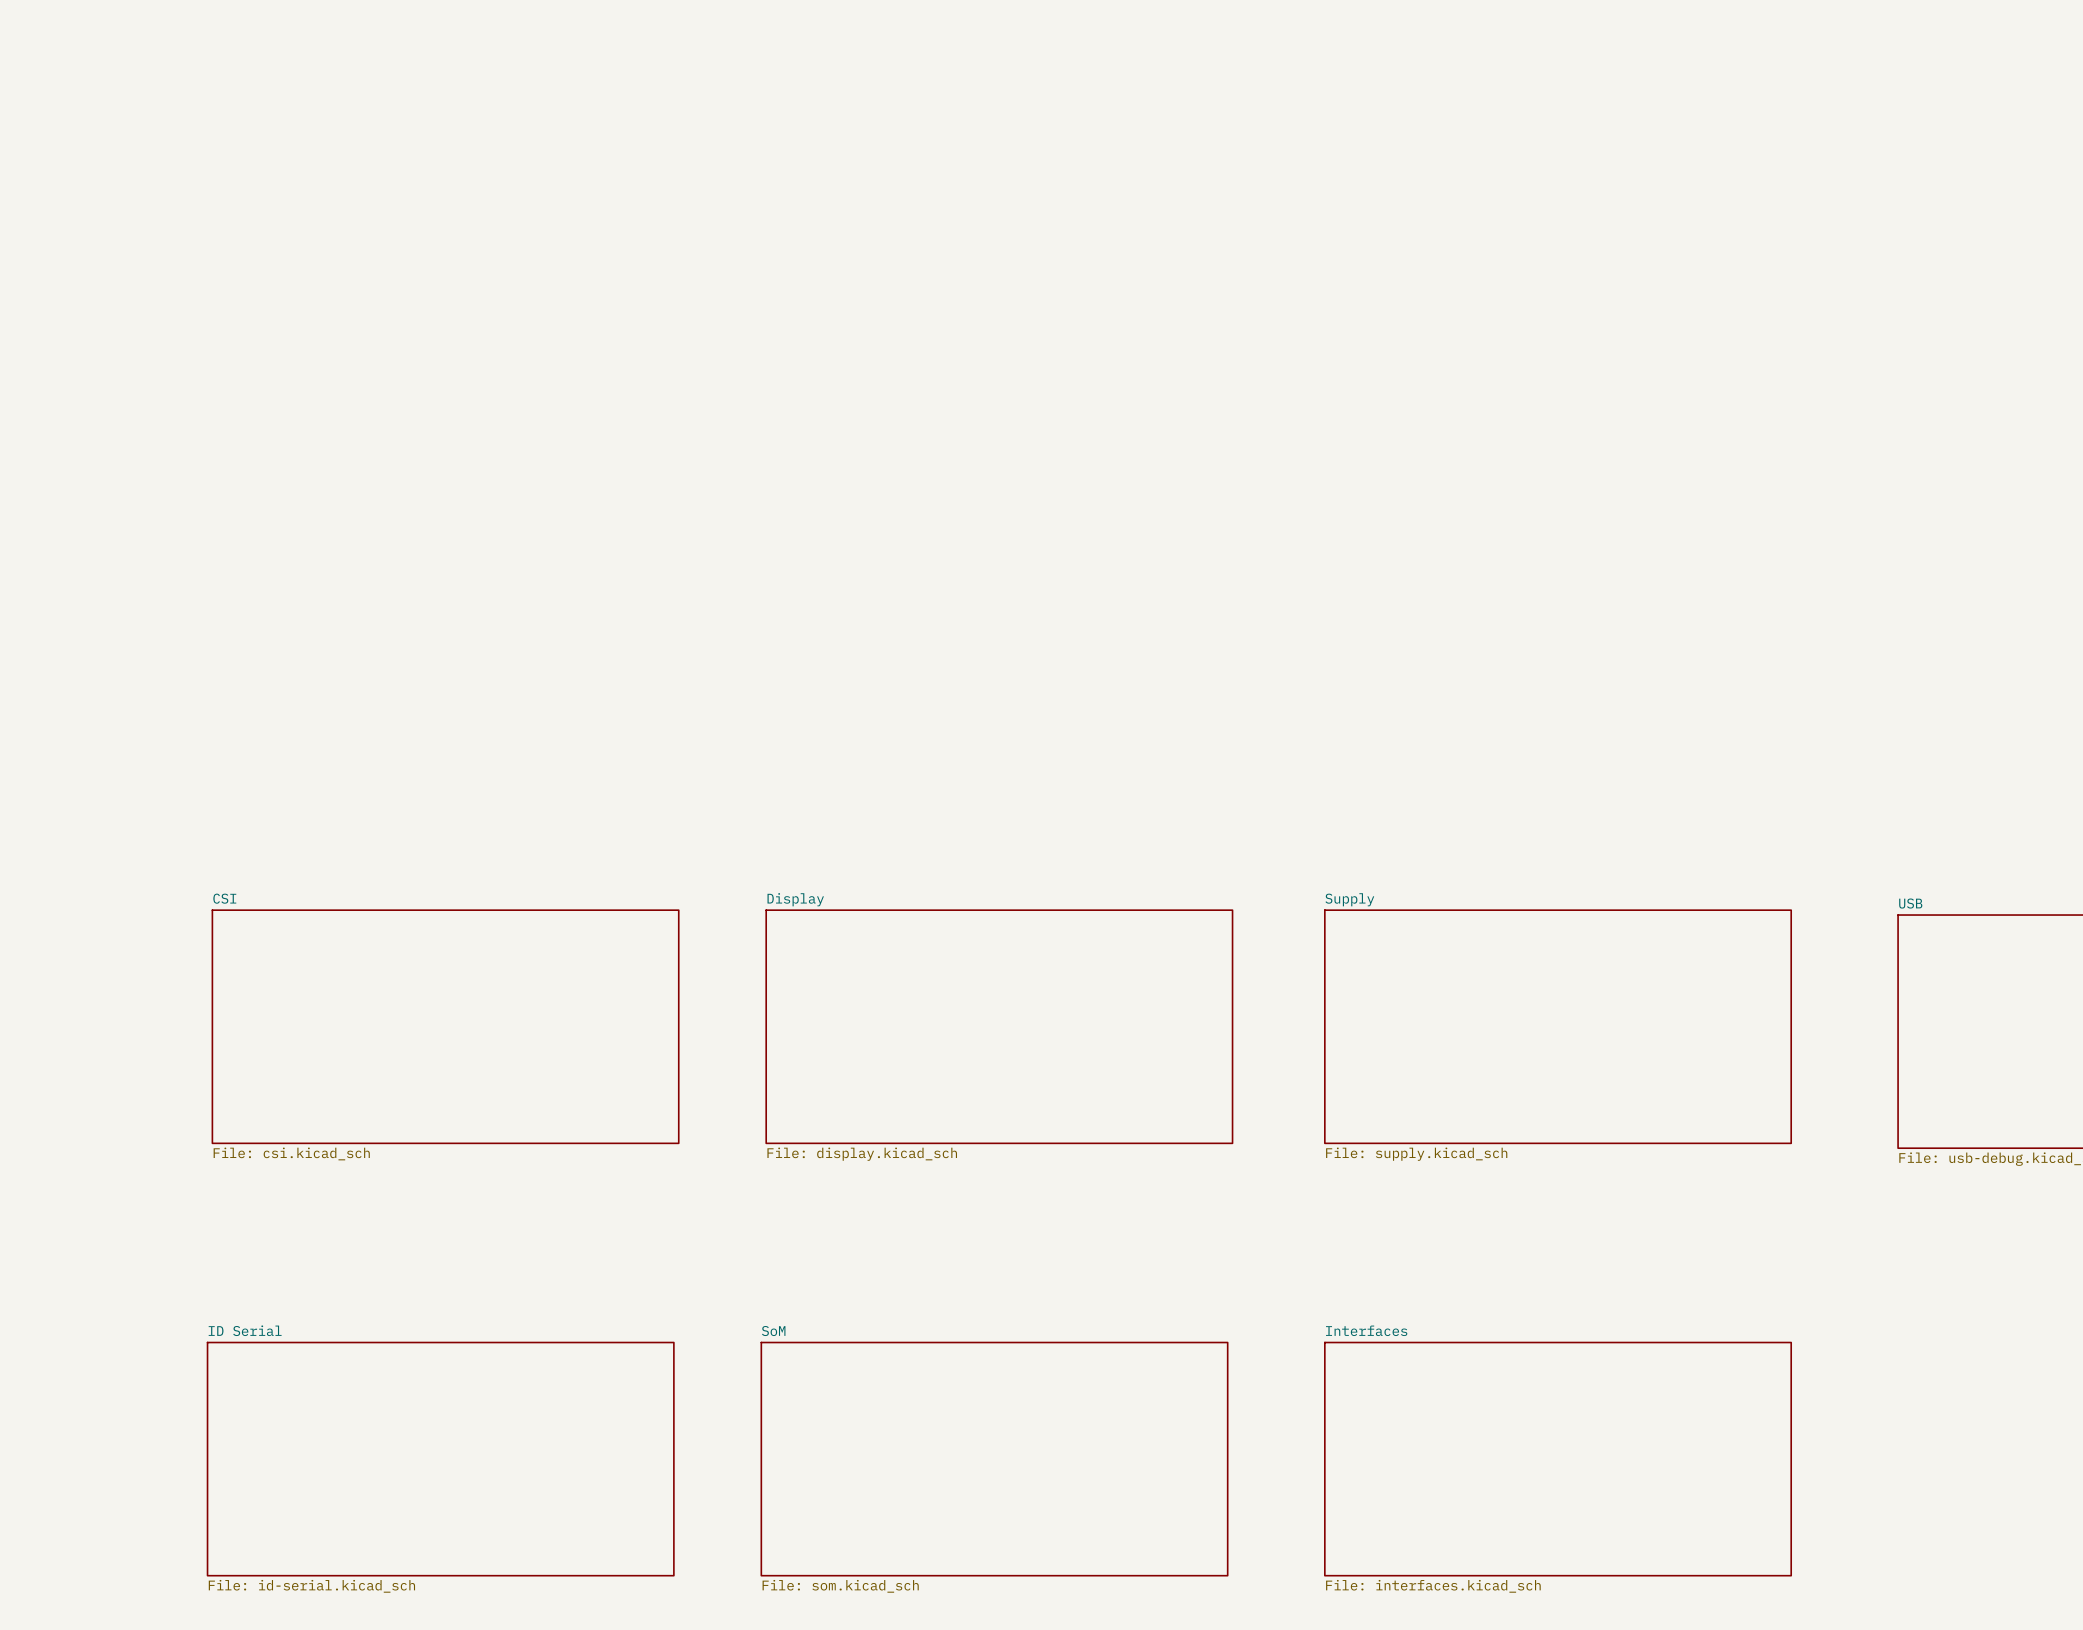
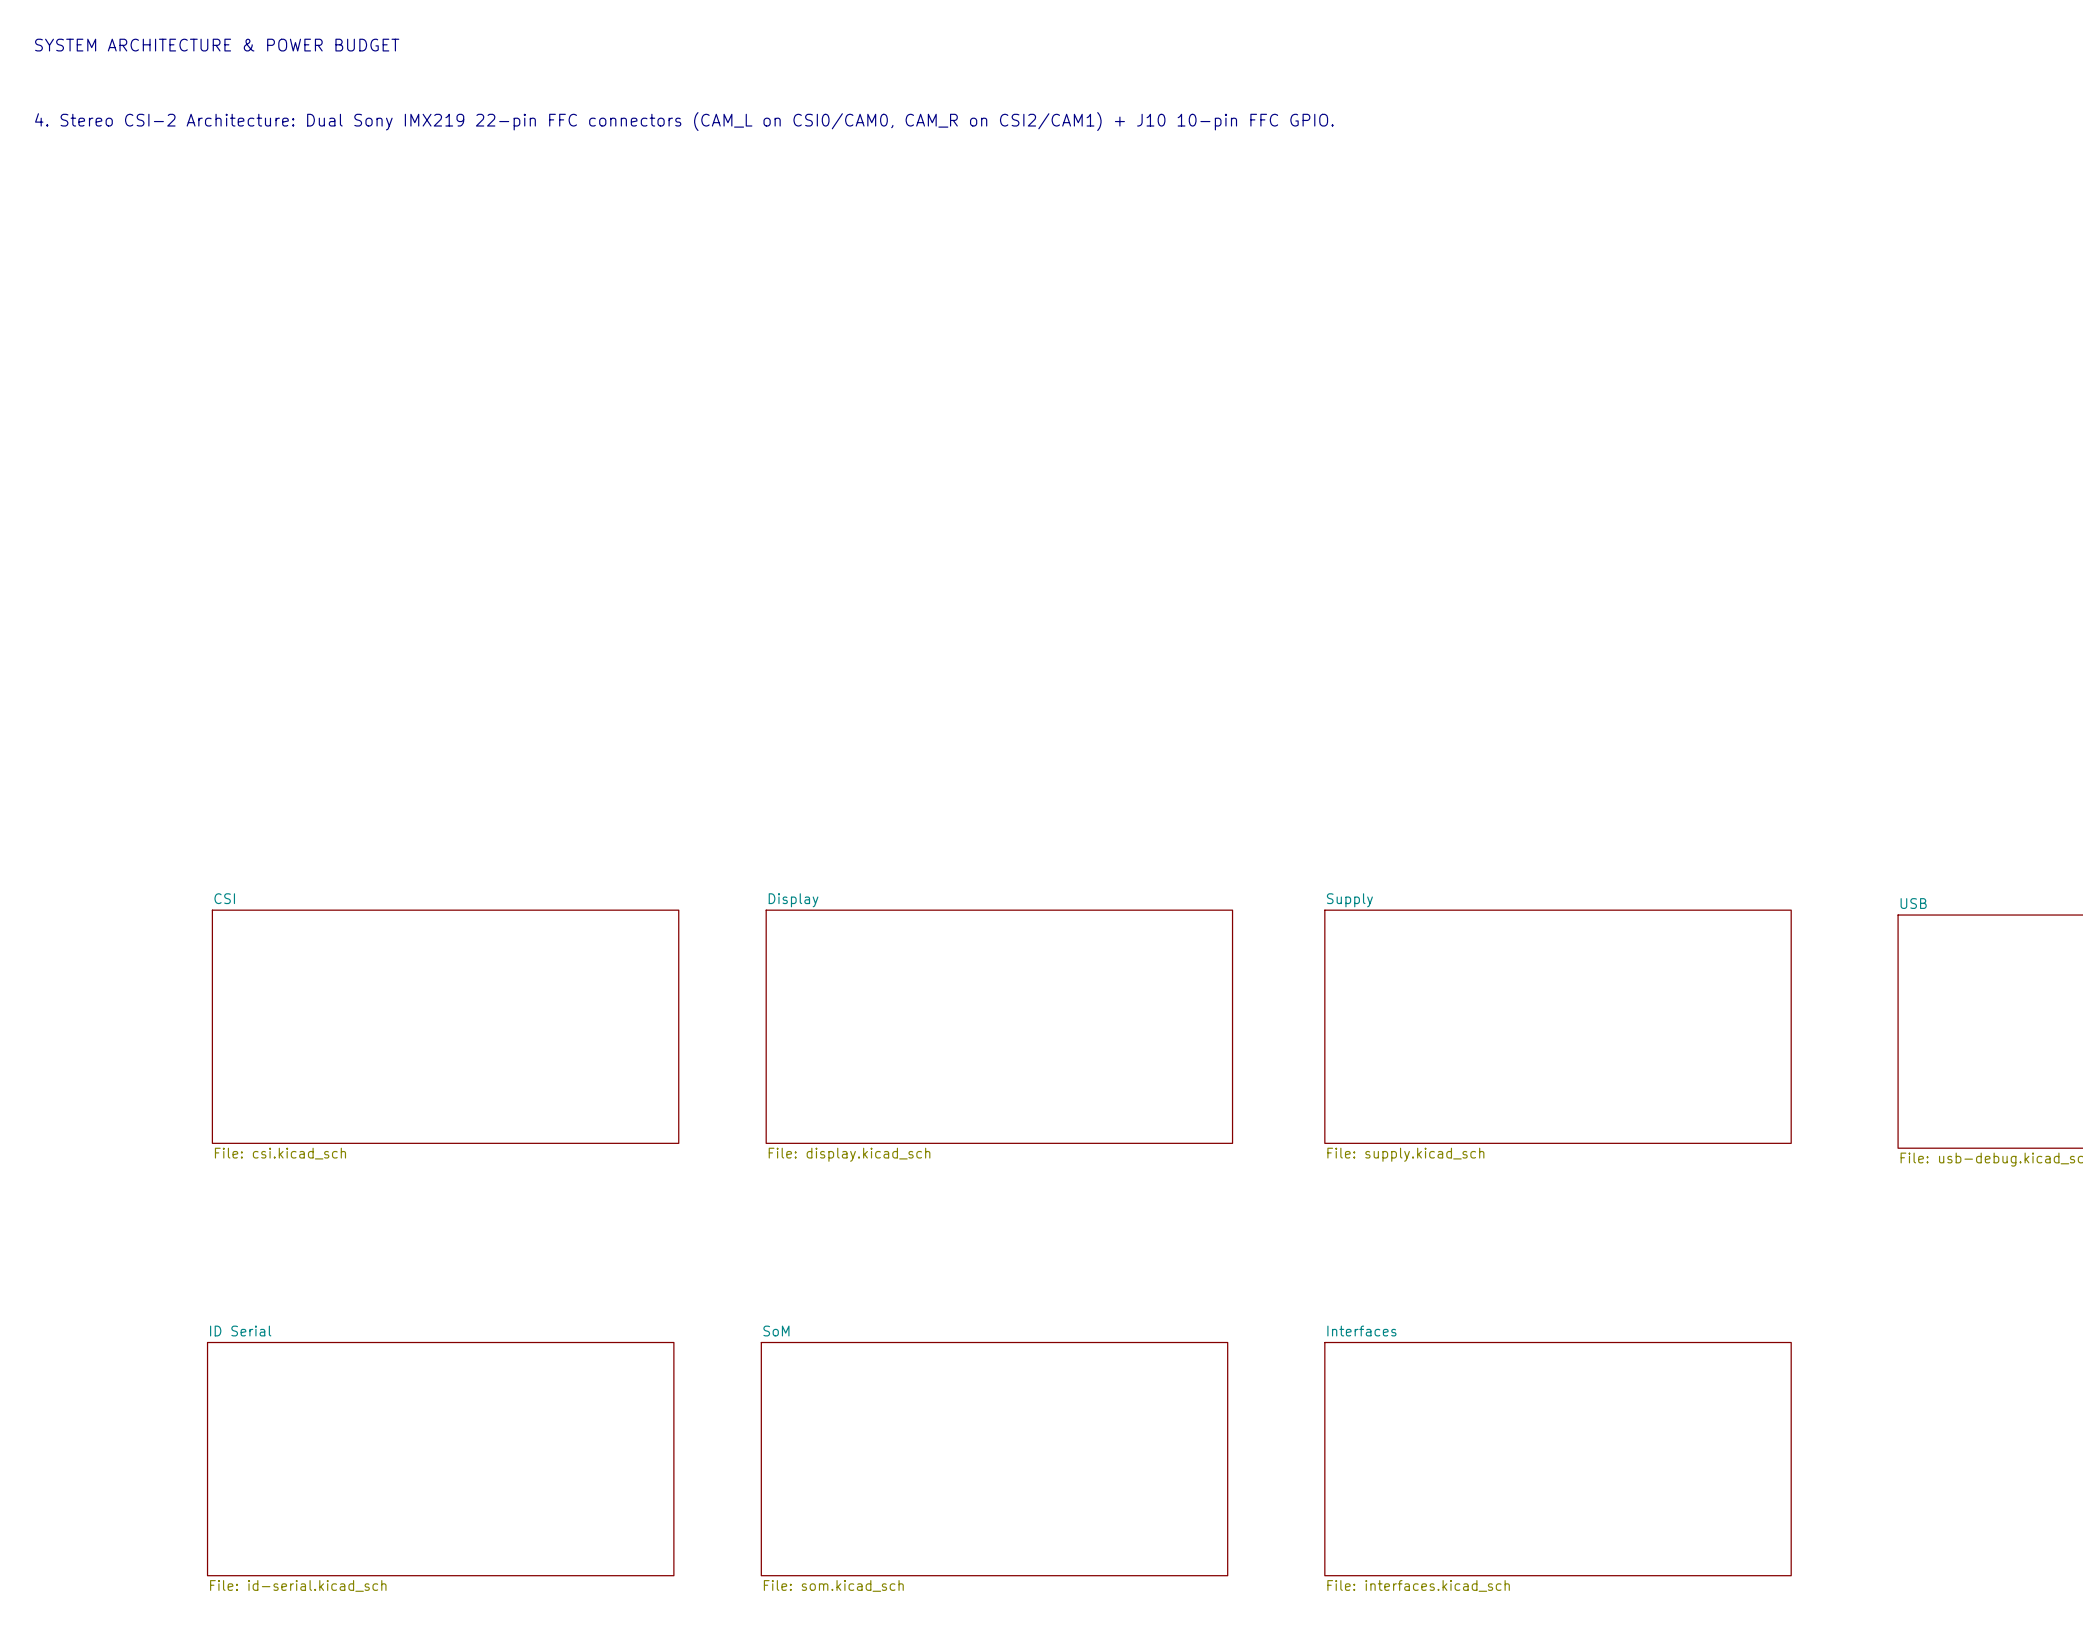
text: none -> SYSTEM ARCHITECTURE & POWER BUDGET (217, 45)
text: none -> 4. Stereo CSI-2 Architecture: Dual Sony IMX219 22-pin FFC connectors (CAM_L on CSI0/CAM0, CAM_R on CSI2/CAM1) + J10 10-pin FFC GPIO. (684, 121)

